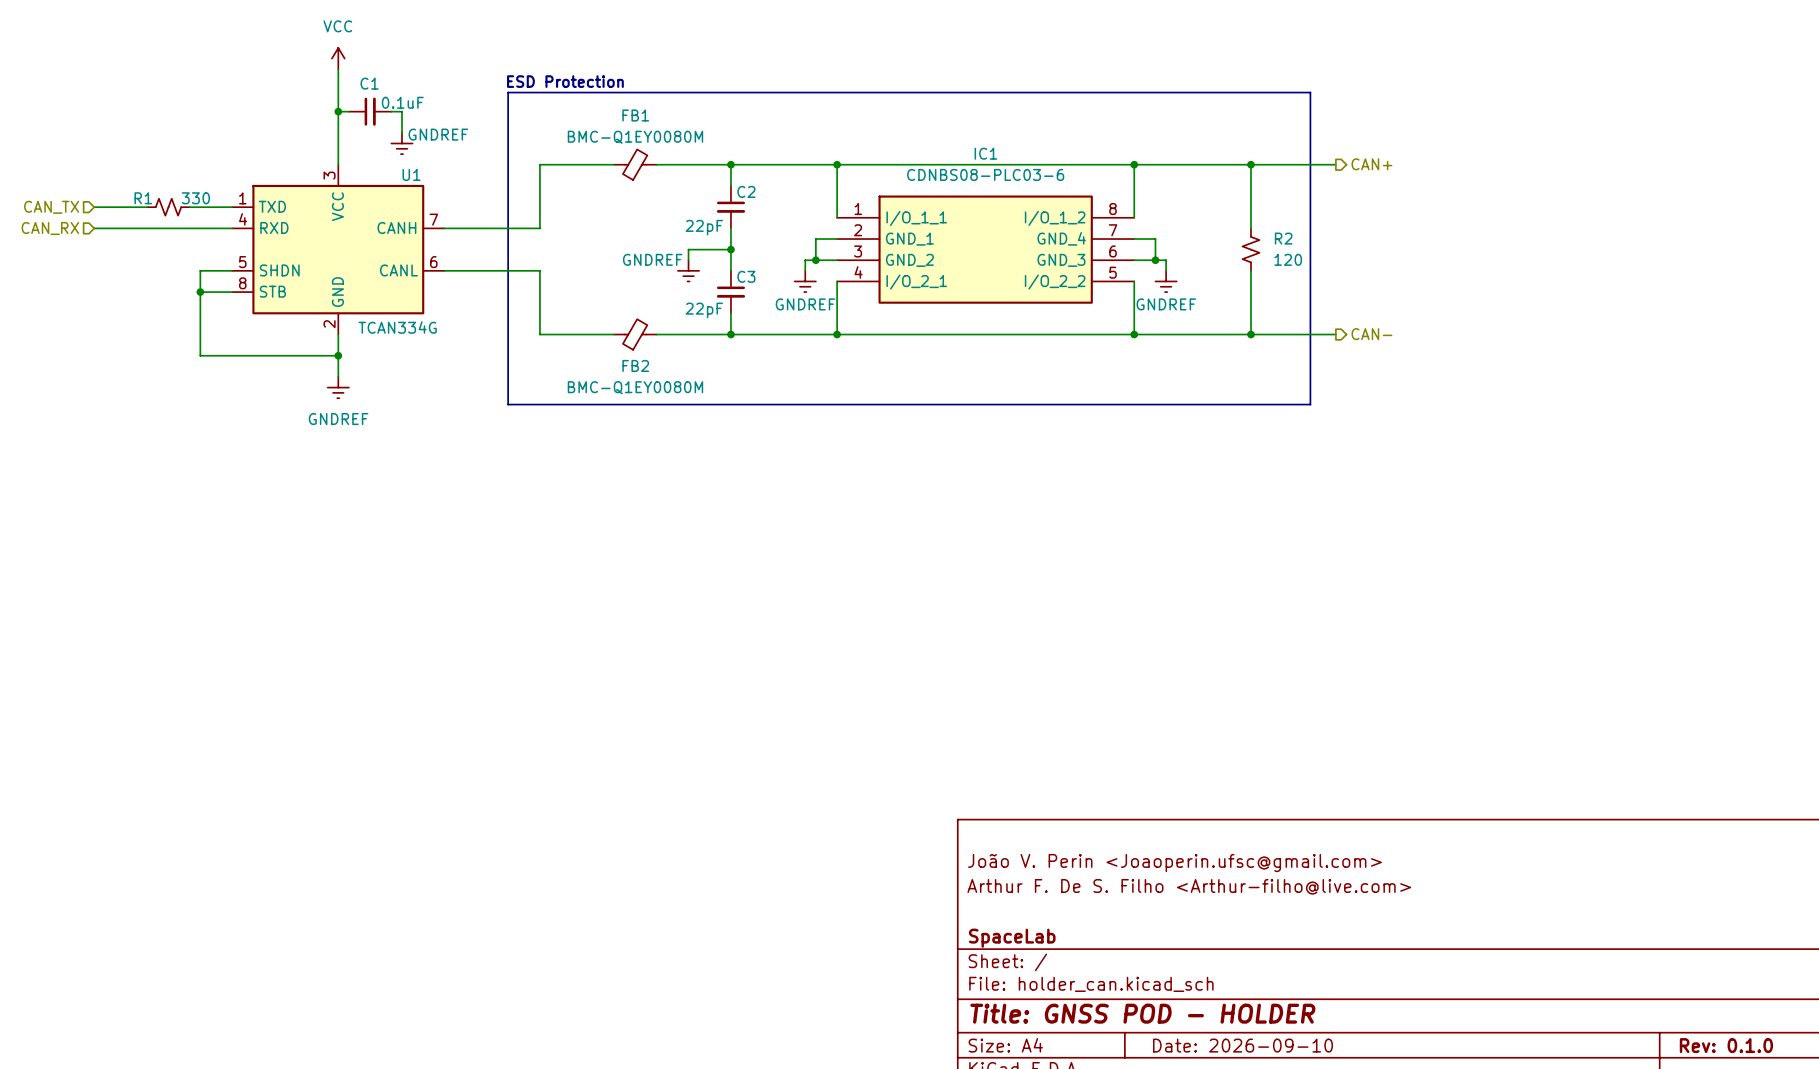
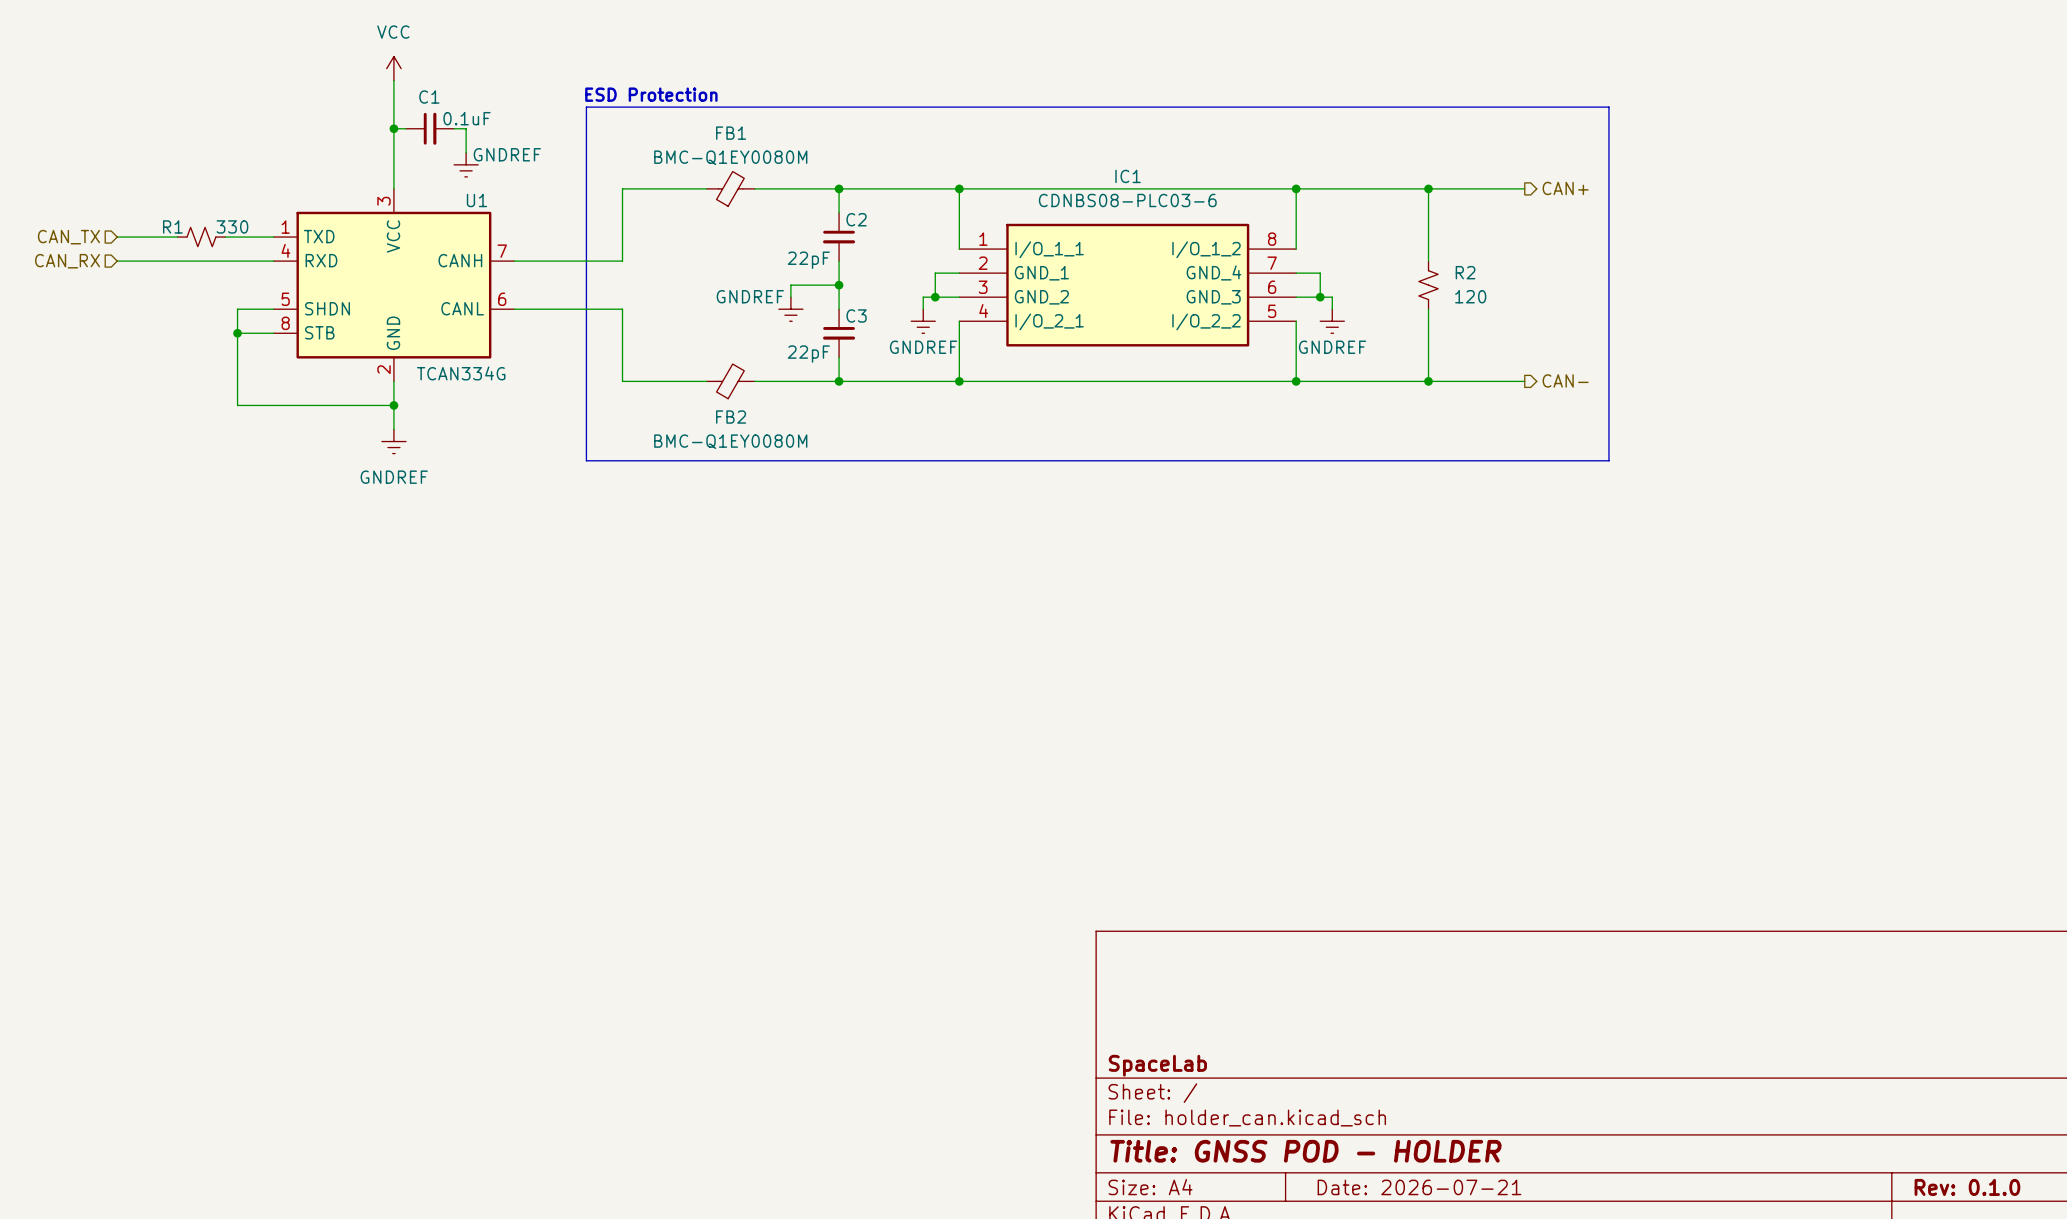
line: (1310, 92) (1310, 404) -> (1495, 107) (1608, 107) (1608, 460) (1495, 460)
title block: João V. Perin <Joaoperin.ufsc@gmail.com> (1174, 863) -> none
title block: Arthur F. De S. Filho <Arthur-filho@live.com> (1189, 886) -> none
title block: Date: 2026-09-10 (1243, 1045) -> Date: 2026-07-21 (1419, 1187)

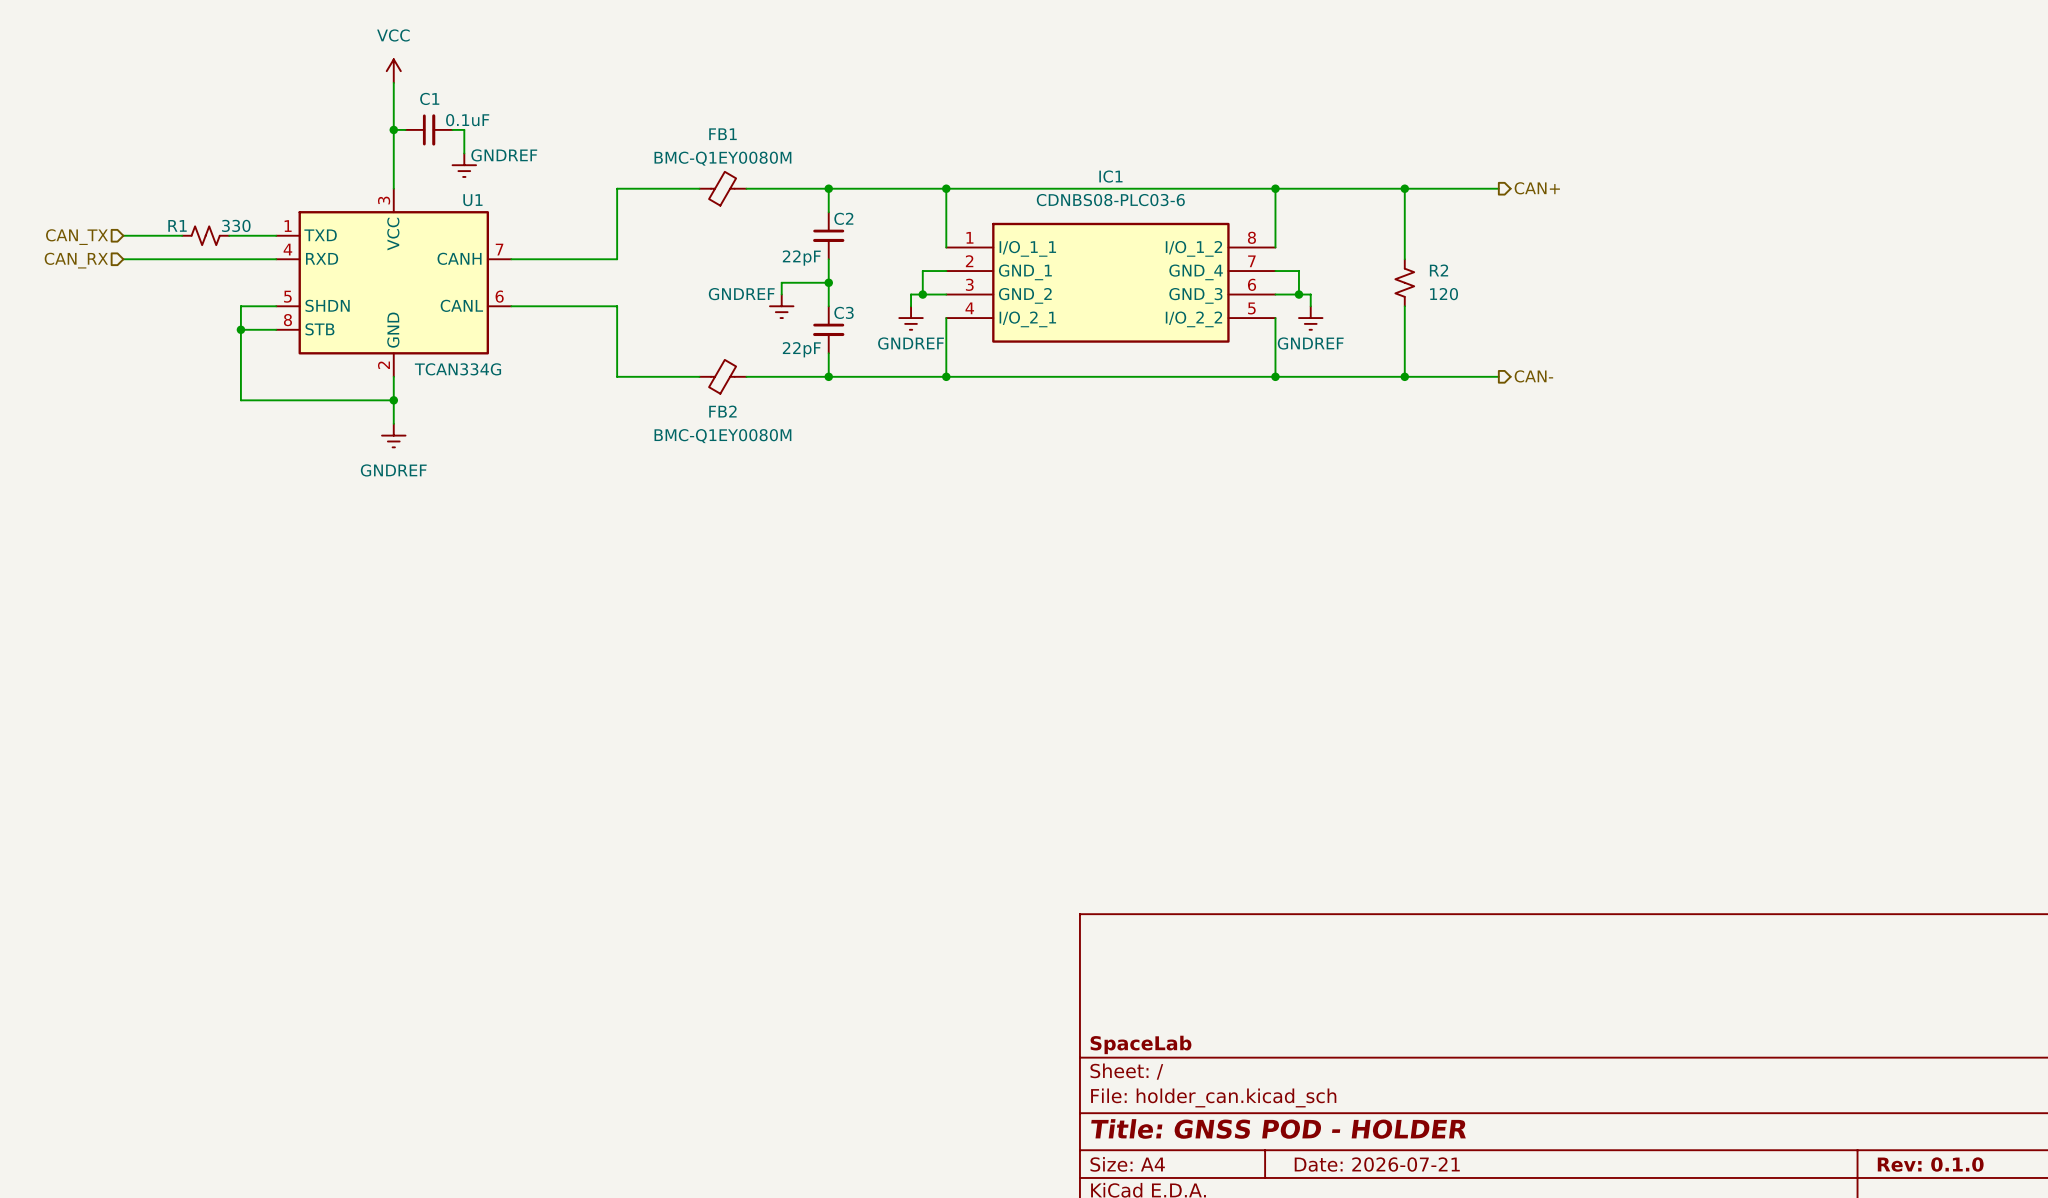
text: ESD Protection (651, 94) -> none
line: (586, 107) (1608, 107) (1608, 460) (586, 460) (586, 107) -> none

